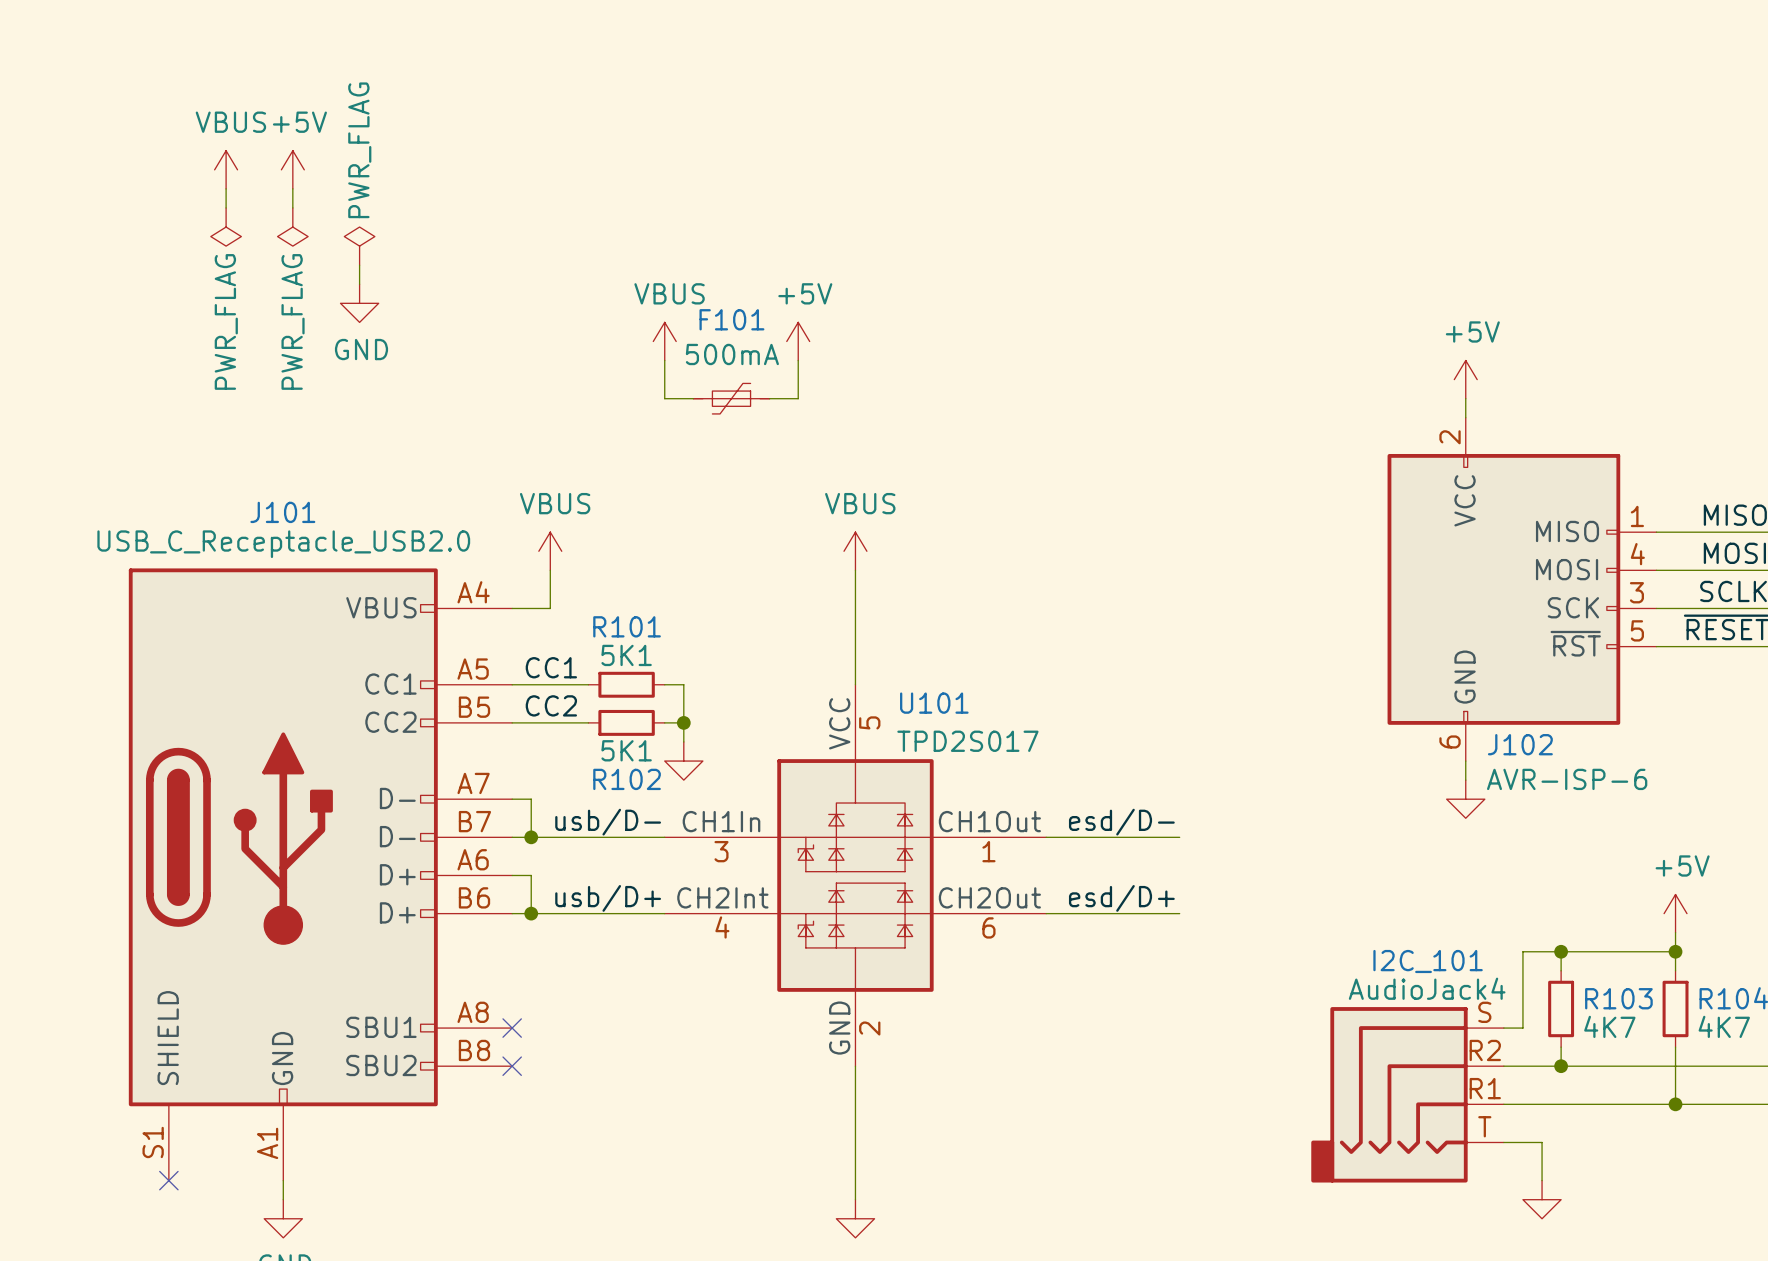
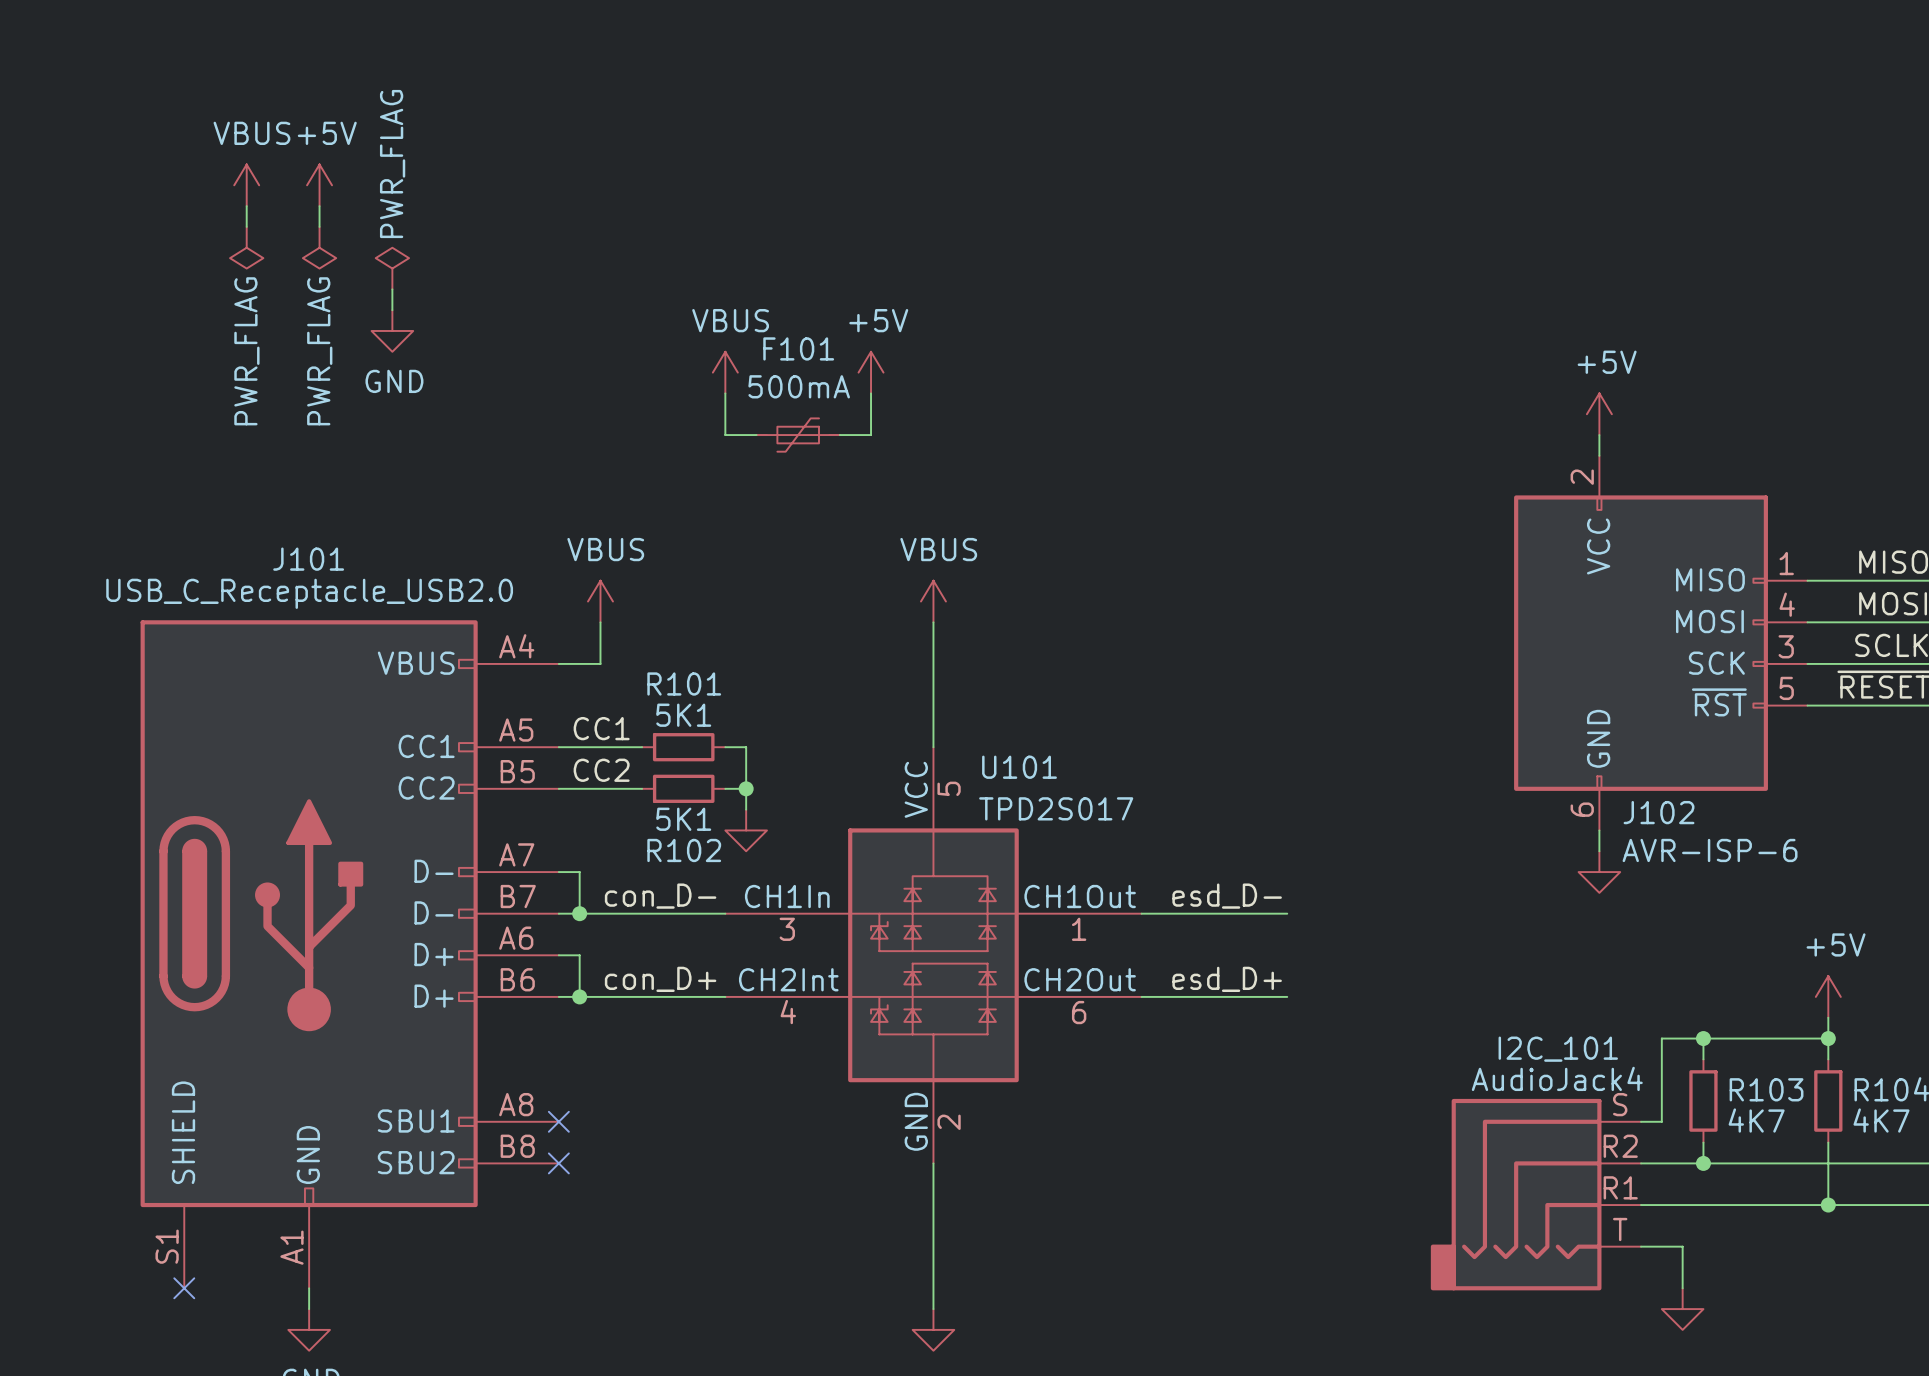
label: usb/D- (608, 822) -> con_D- (660, 896)
label: esd/D- (1121, 822) -> esd_D- (1227, 896)
label: usb/D+ (608, 898) -> con_D+ (660, 979)
label: esd/D+ (1121, 898) -> esd_D+ (1227, 979)

